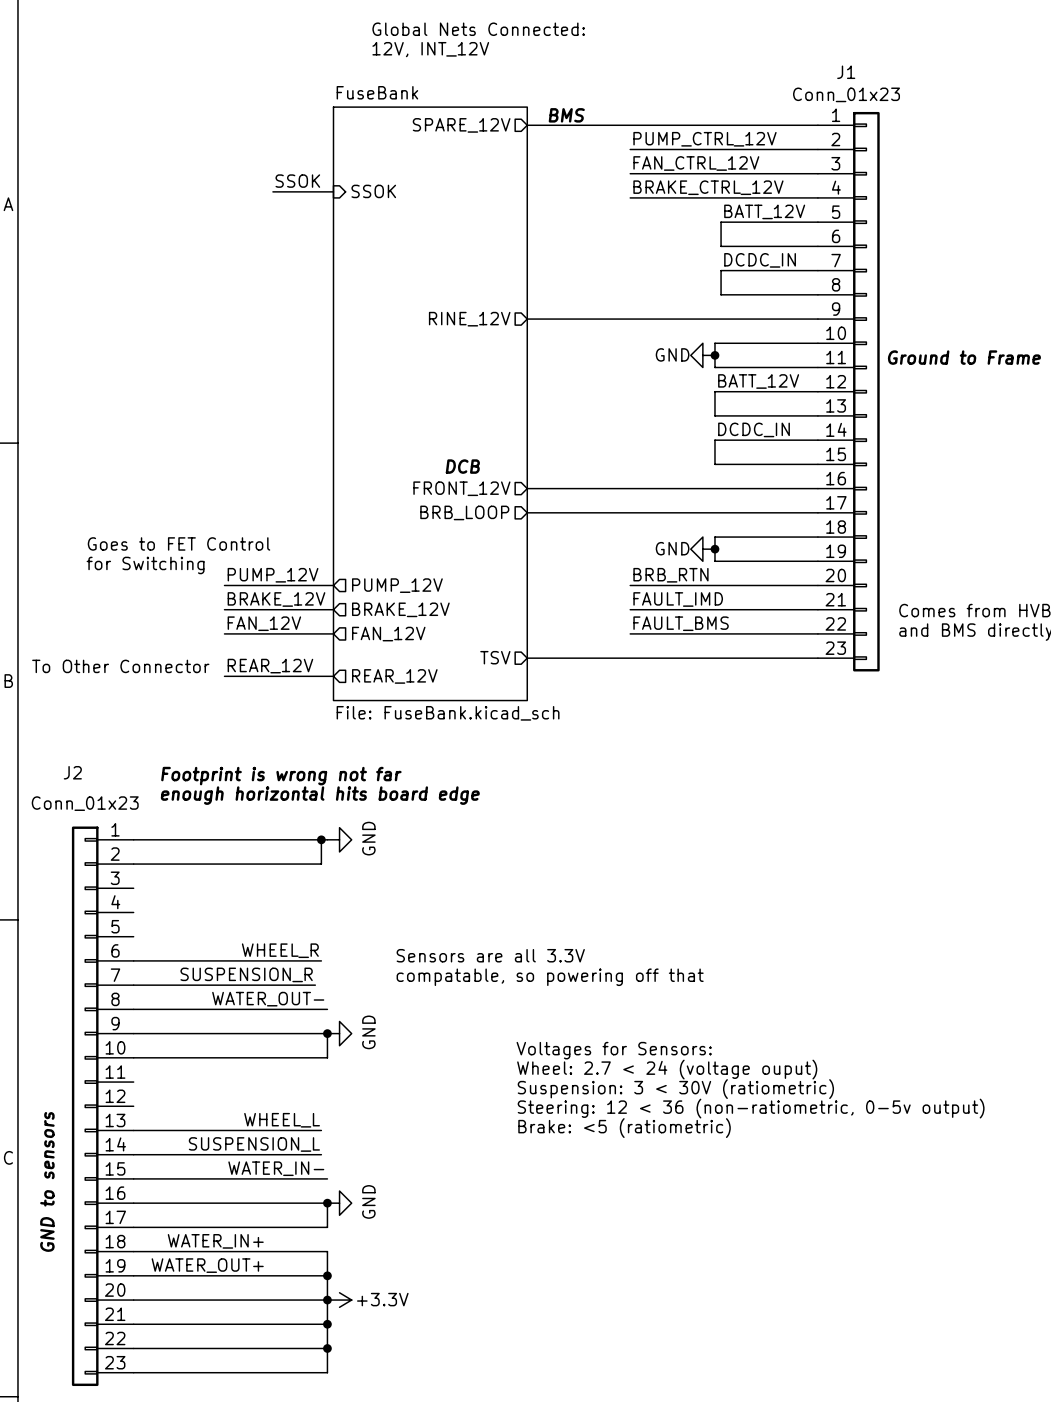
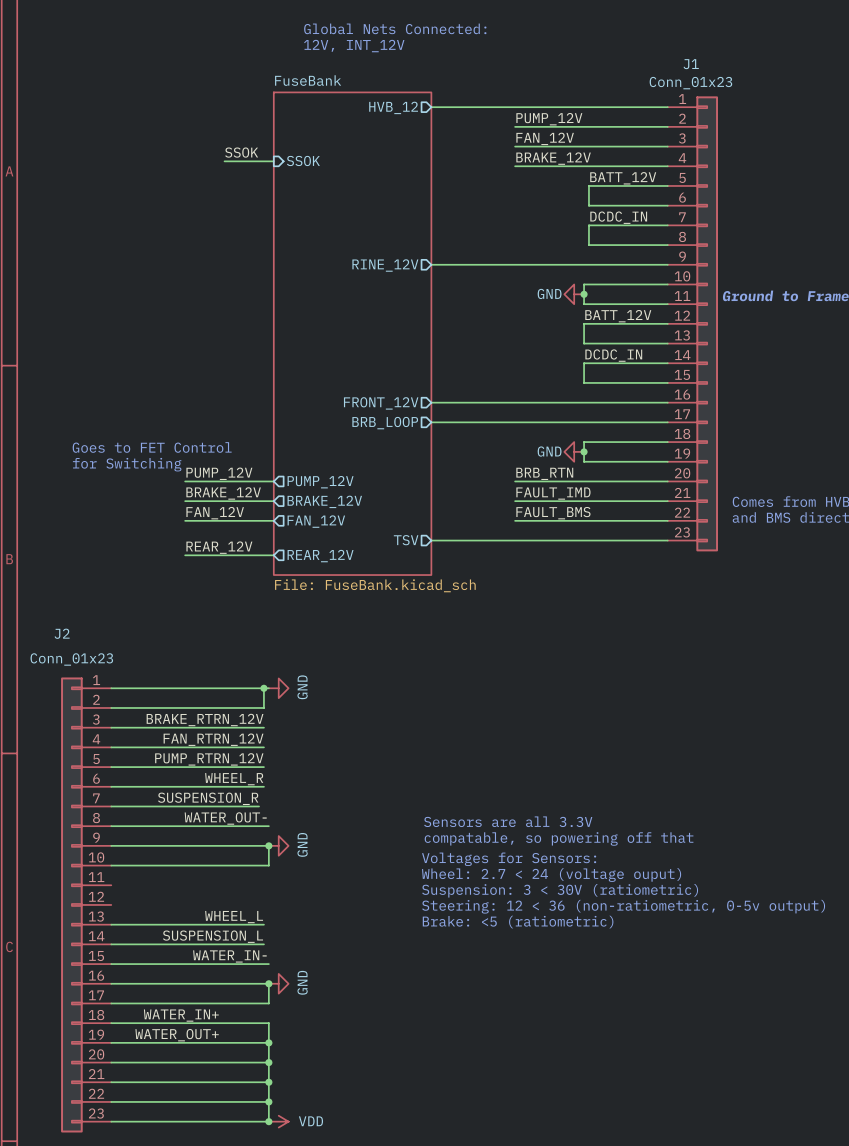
text: BMS (566, 115) -> none
sheet pin: SPARE_12V (461, 125) -> HVB_12 (393, 107)
label: PUMP_CTRL_12V (704, 139) -> PUMP_12V (549, 119)
label: FAN_CTRL_12V (696, 163) -> FAN_12V (545, 138)
label: BRAKE_CTRL_12V (708, 187) -> BRAKE_12V (553, 158)
text: DCB (462, 466) -> none
text: To Other Connector (120, 666) -> none
text: Footprint is wrong not far (281, 776) -> none
text: enough horizontal hits board edge (320, 795) -> none
label: none -> BRAKE_RTRN_12V (205, 720)
wire: none -> (111, 727) (263, 727)
label: none -> FAN_RTRN_12V (213, 739)
wire: none -> (111, 747) (263, 747)
label: none -> PUMP_RTRN_12V (209, 759)
wire: none -> (111, 767) (263, 767)
text position: Sensors are all 3.3V (490, 955) -> Sensors are all 3.3V (508, 821)
text position: compatable, so powering off that (550, 977) -> compatable, so powering off that (559, 838)
text: GND to sensors (47, 1181) -> none
power symbol: +3.3V (339, 1300) -> none
junction: none -> (268, 1121)
power symbol: none -> VDD (278, 1121)

